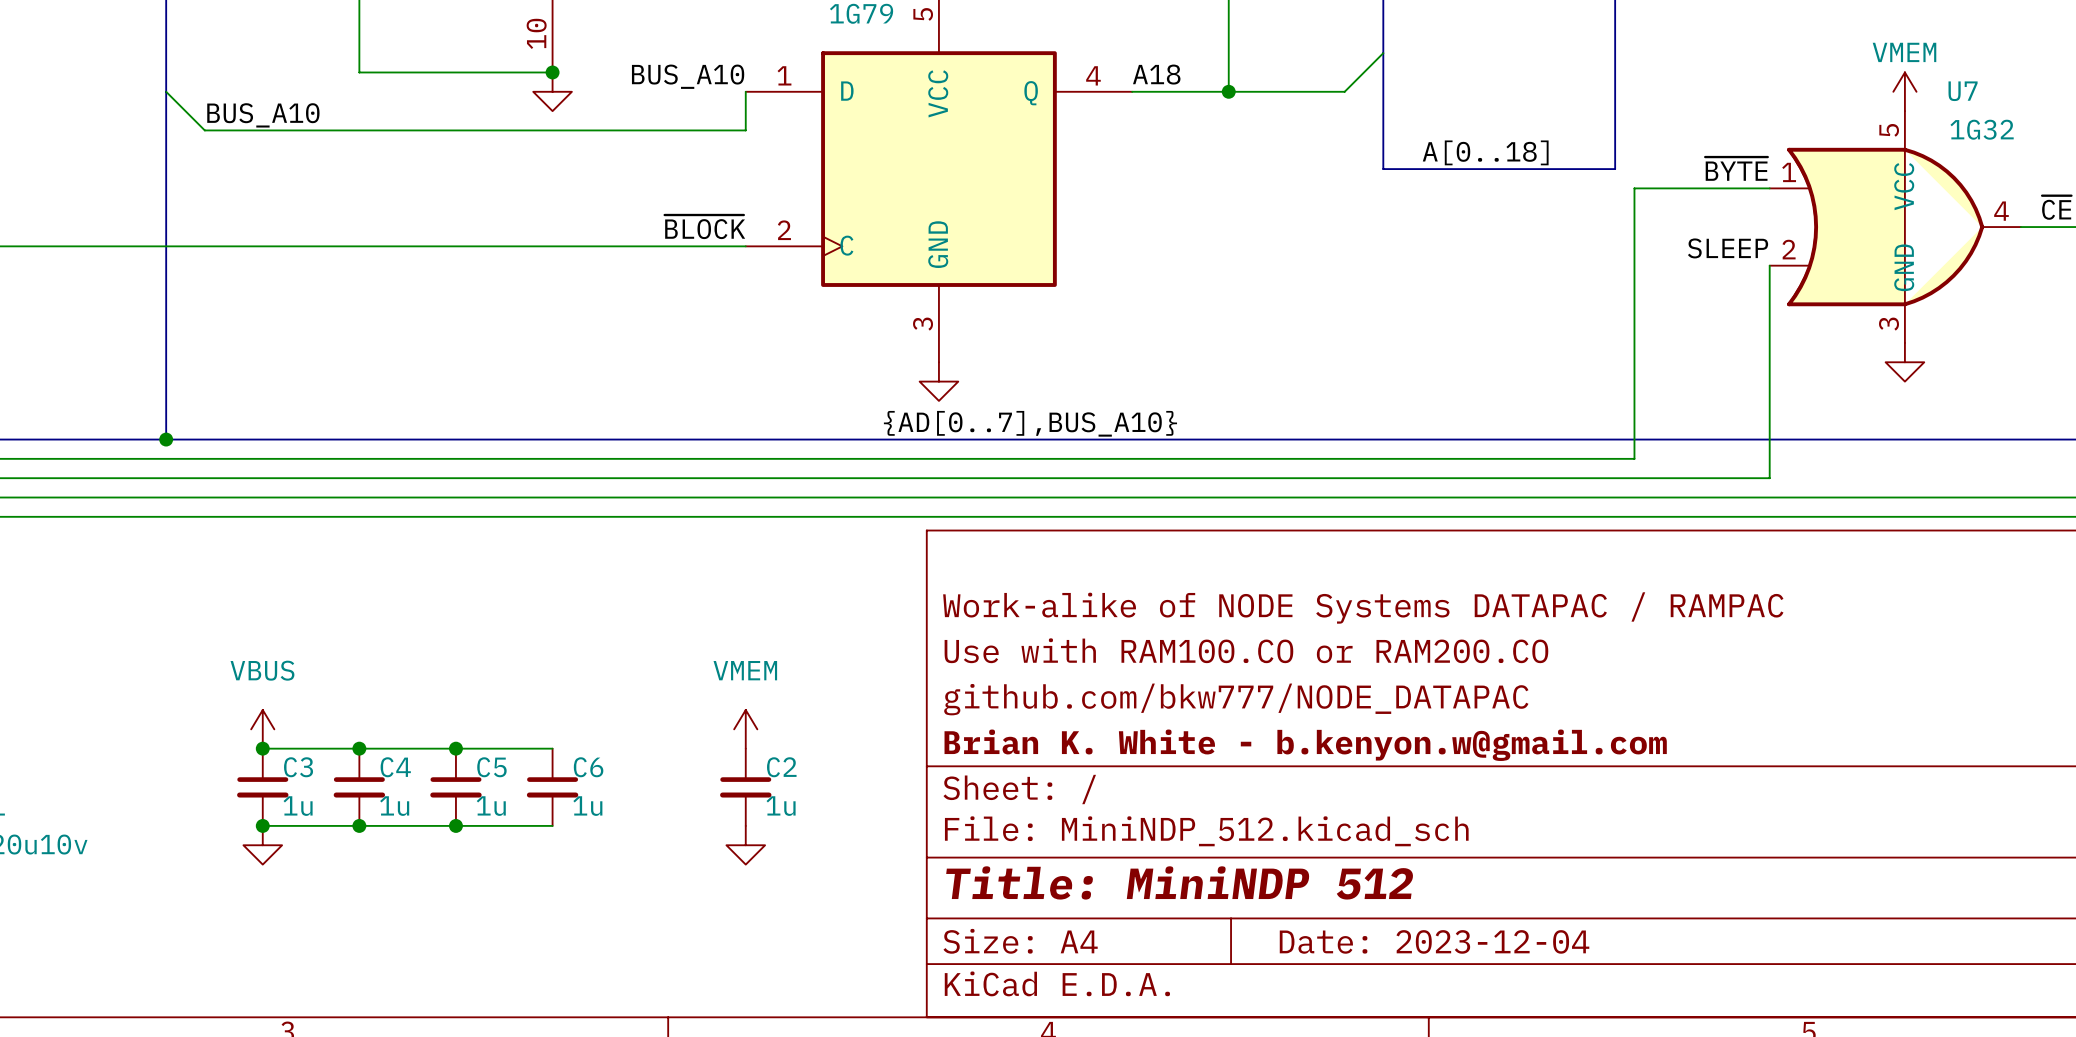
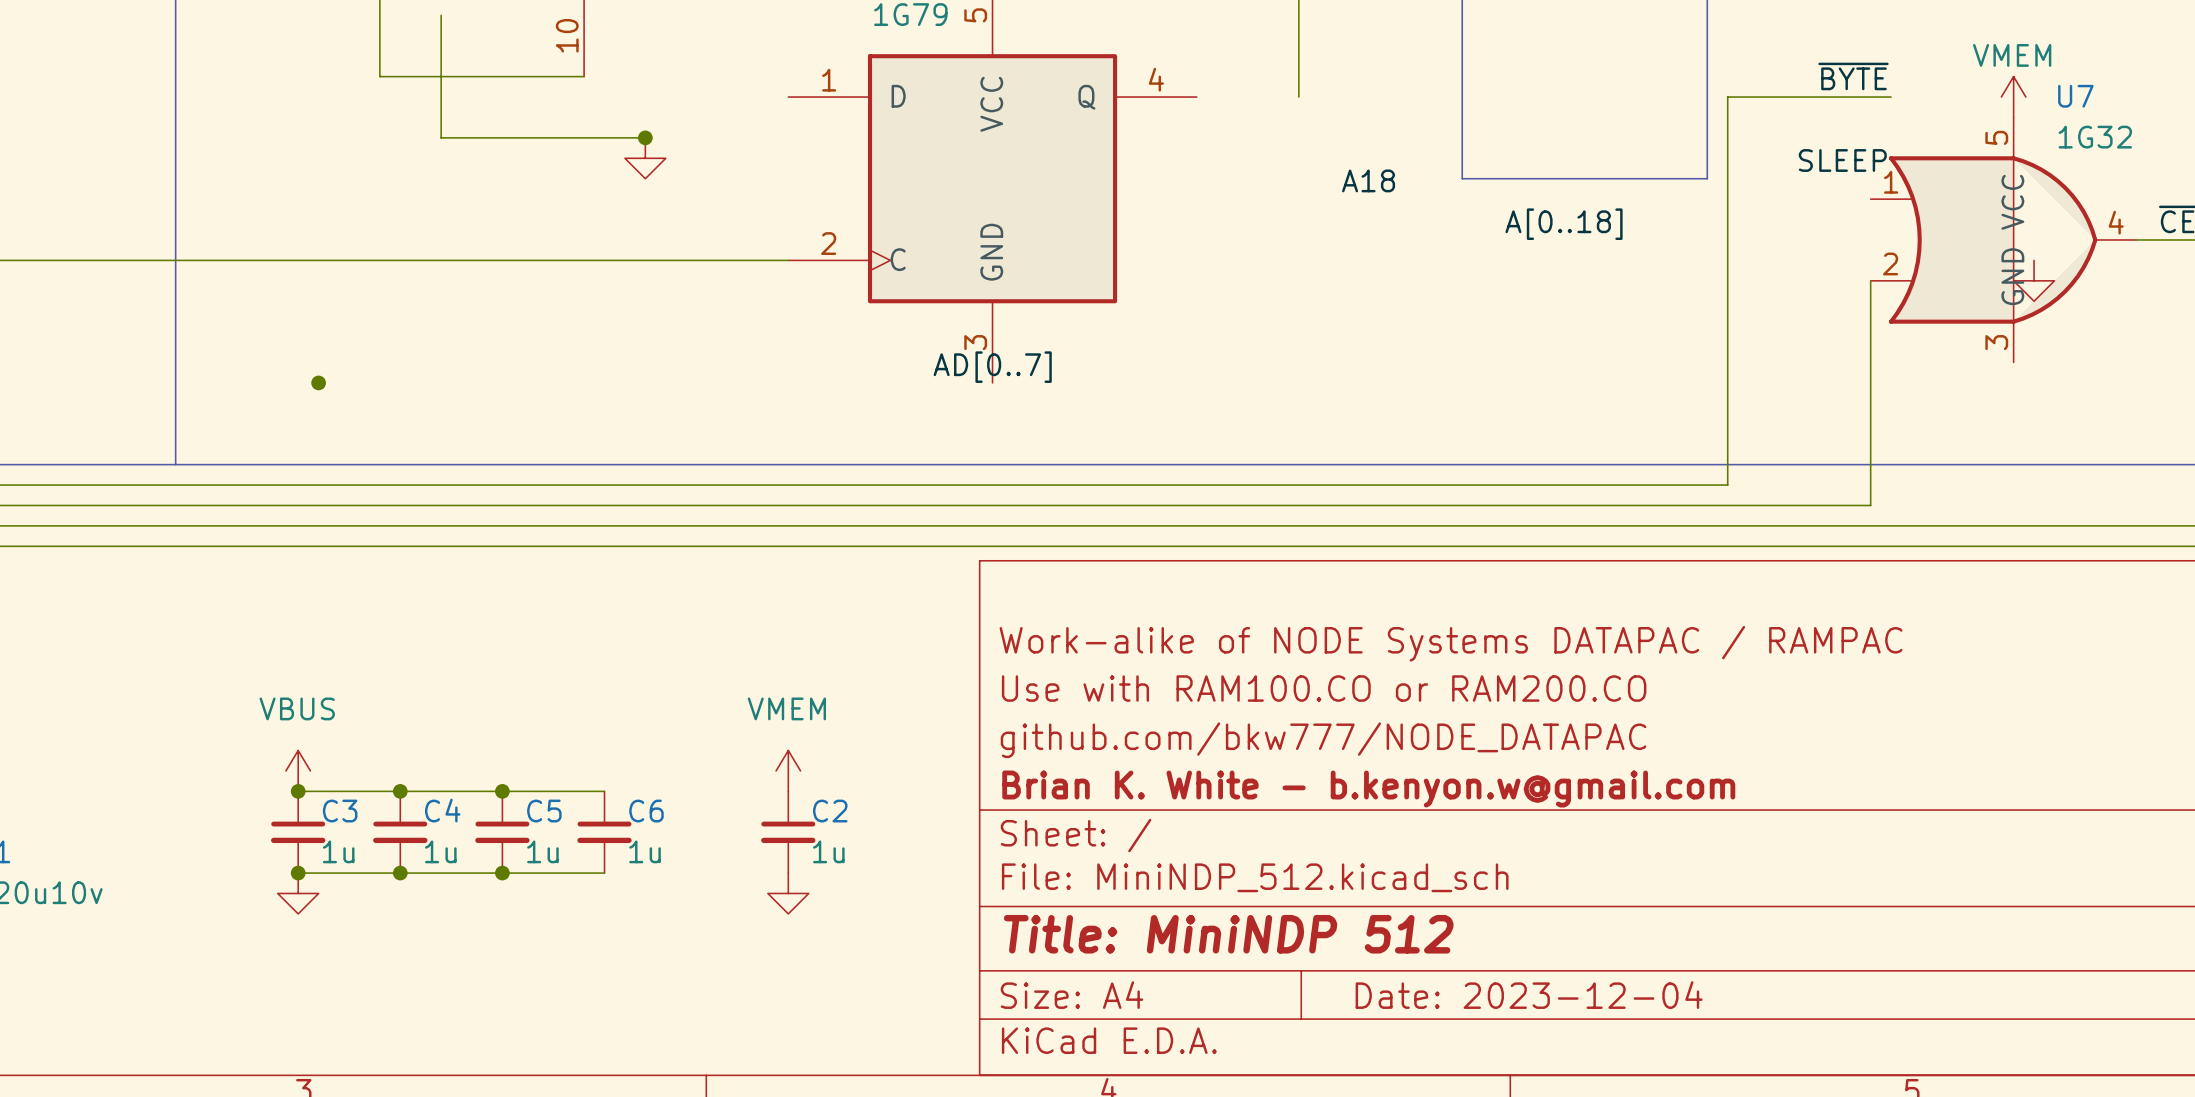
wire: (1383, 53) (1344, 91) (1132, 91) -> none
junction position: (552, 72) -> (645, 137)
label position: A18 (1156, 74) -> A18 (1368, 180)
label: BUS_A10 (688, 76) -> none
wire: (166, 91) (204, 130) (417, 130) -> (441, 15) (441, 137)
power symbol position: (552, 91) -> (645, 158)
wire: (745, 91) (745, 130) (610, 130) -> none
junction: (1228, 91) -> none
label: BUS_A10 (263, 115) -> none
label position: A[0..18] (1485, 152) -> A[0..18] (1564, 224)
label position: ~{BYTE} (1736, 168) -> ~{BYTE} (1853, 76)
wire: (1634, 188) (1769, 188) -> (1727, 199) (1727, 97) (1891, 97)
label: ~{BLOCK} (704, 227) -> none
label position: SLEEP (1728, 248) -> SLEEP (1842, 160)
label: none -> AD[0..7] (992, 367)
junction: none -> (318, 382)
power symbol position: (1904, 362) -> (2034, 280)
power symbol: (938, 381) -> none
label: {AD[0..7],BUS_A10} (1030, 423) -> none
junction: (166, 439) -> none
power symbol position: VBUS (262, 729) -> VBUS (298, 770)
wire: (262, 748) (282, 748) -> (584, 791) (604, 791)
junction position: (262, 748) -> (298, 791)
junction position: (359, 748) -> (400, 791)
junction position: (455, 748) -> (502, 791)
C3 position: (262, 787) -> (298, 832)
C4 position: (359, 787) -> (400, 832)
C5 position: (455, 787) -> (502, 832)
C6 position: (552, 787) -> (604, 832)
wire: (262, 825) (282, 825) -> (584, 873) (604, 873)
junction position: (262, 825) -> (298, 873)
junction position: (359, 825) -> (400, 873)
junction position: (455, 825) -> (502, 873)
power symbol position: (262, 845) -> (298, 893)

